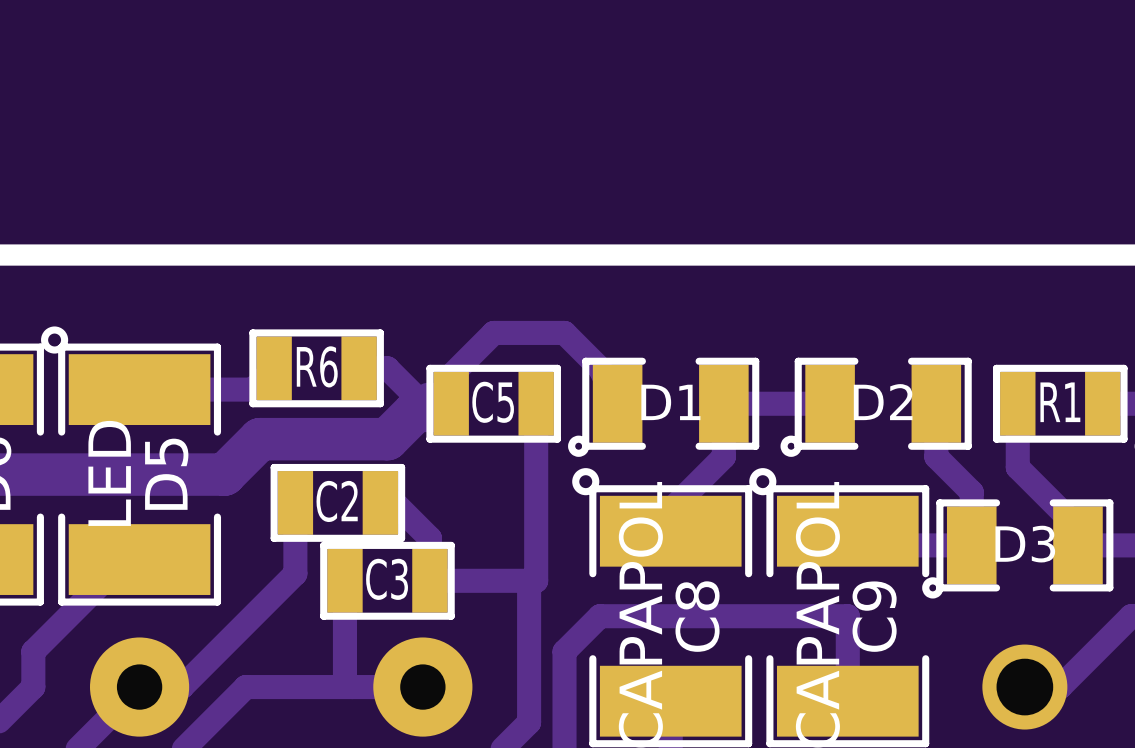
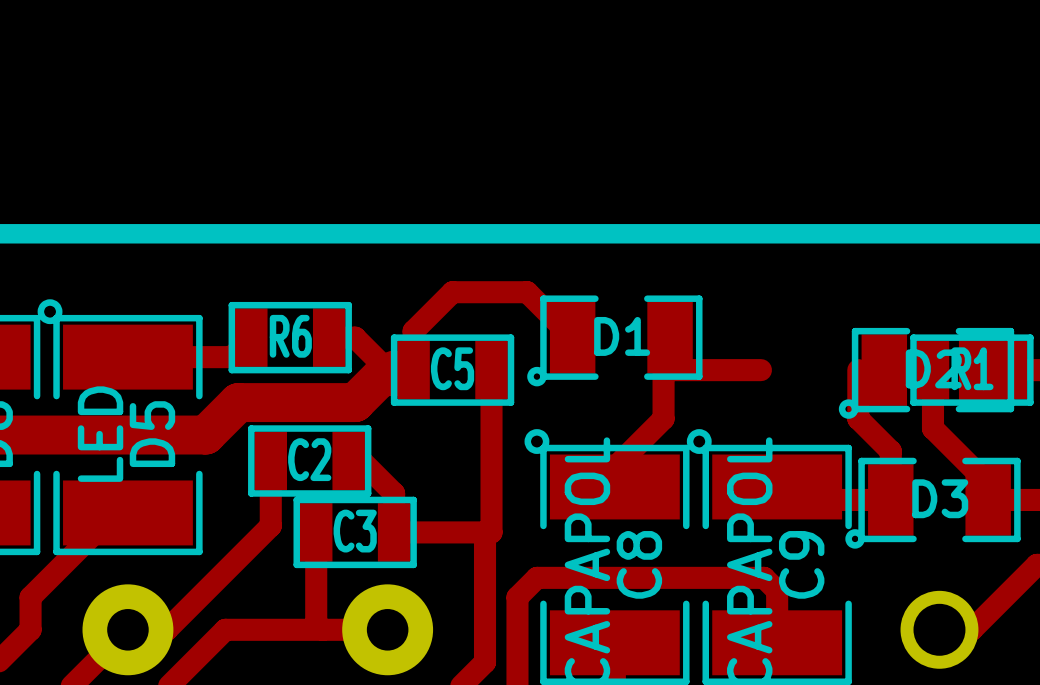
track: (451, 375) (493, 332) (564, 332) (599, 368) (617, 403) -> (413, 344) (413, 331) (452, 292) (527, 292) (572, 337)
D1 position: (663, 407) -> (614, 340)
D2 position: (876, 407) -> (926, 373)
track: (585, 630) (599, 616) (847, 616) (847, 644) -> (536, 577) (764, 577) (777, 590)

